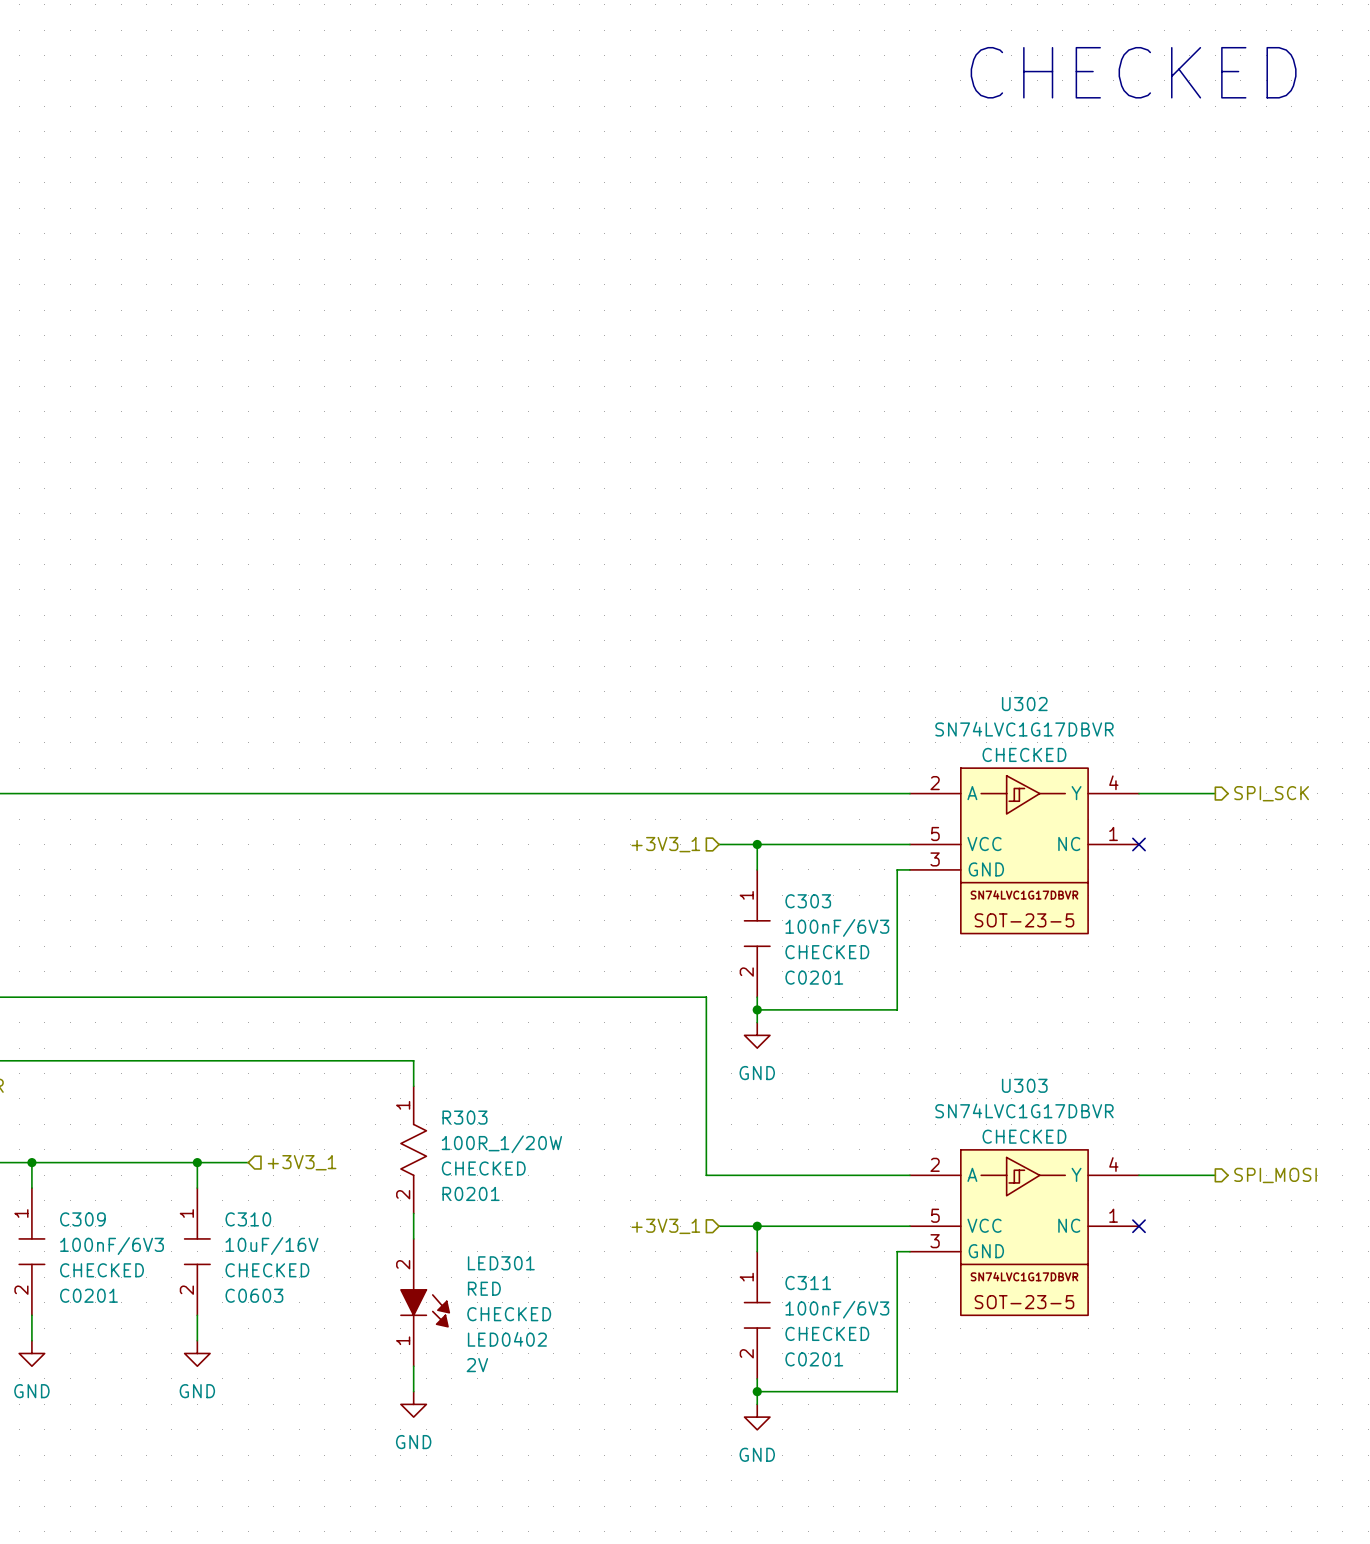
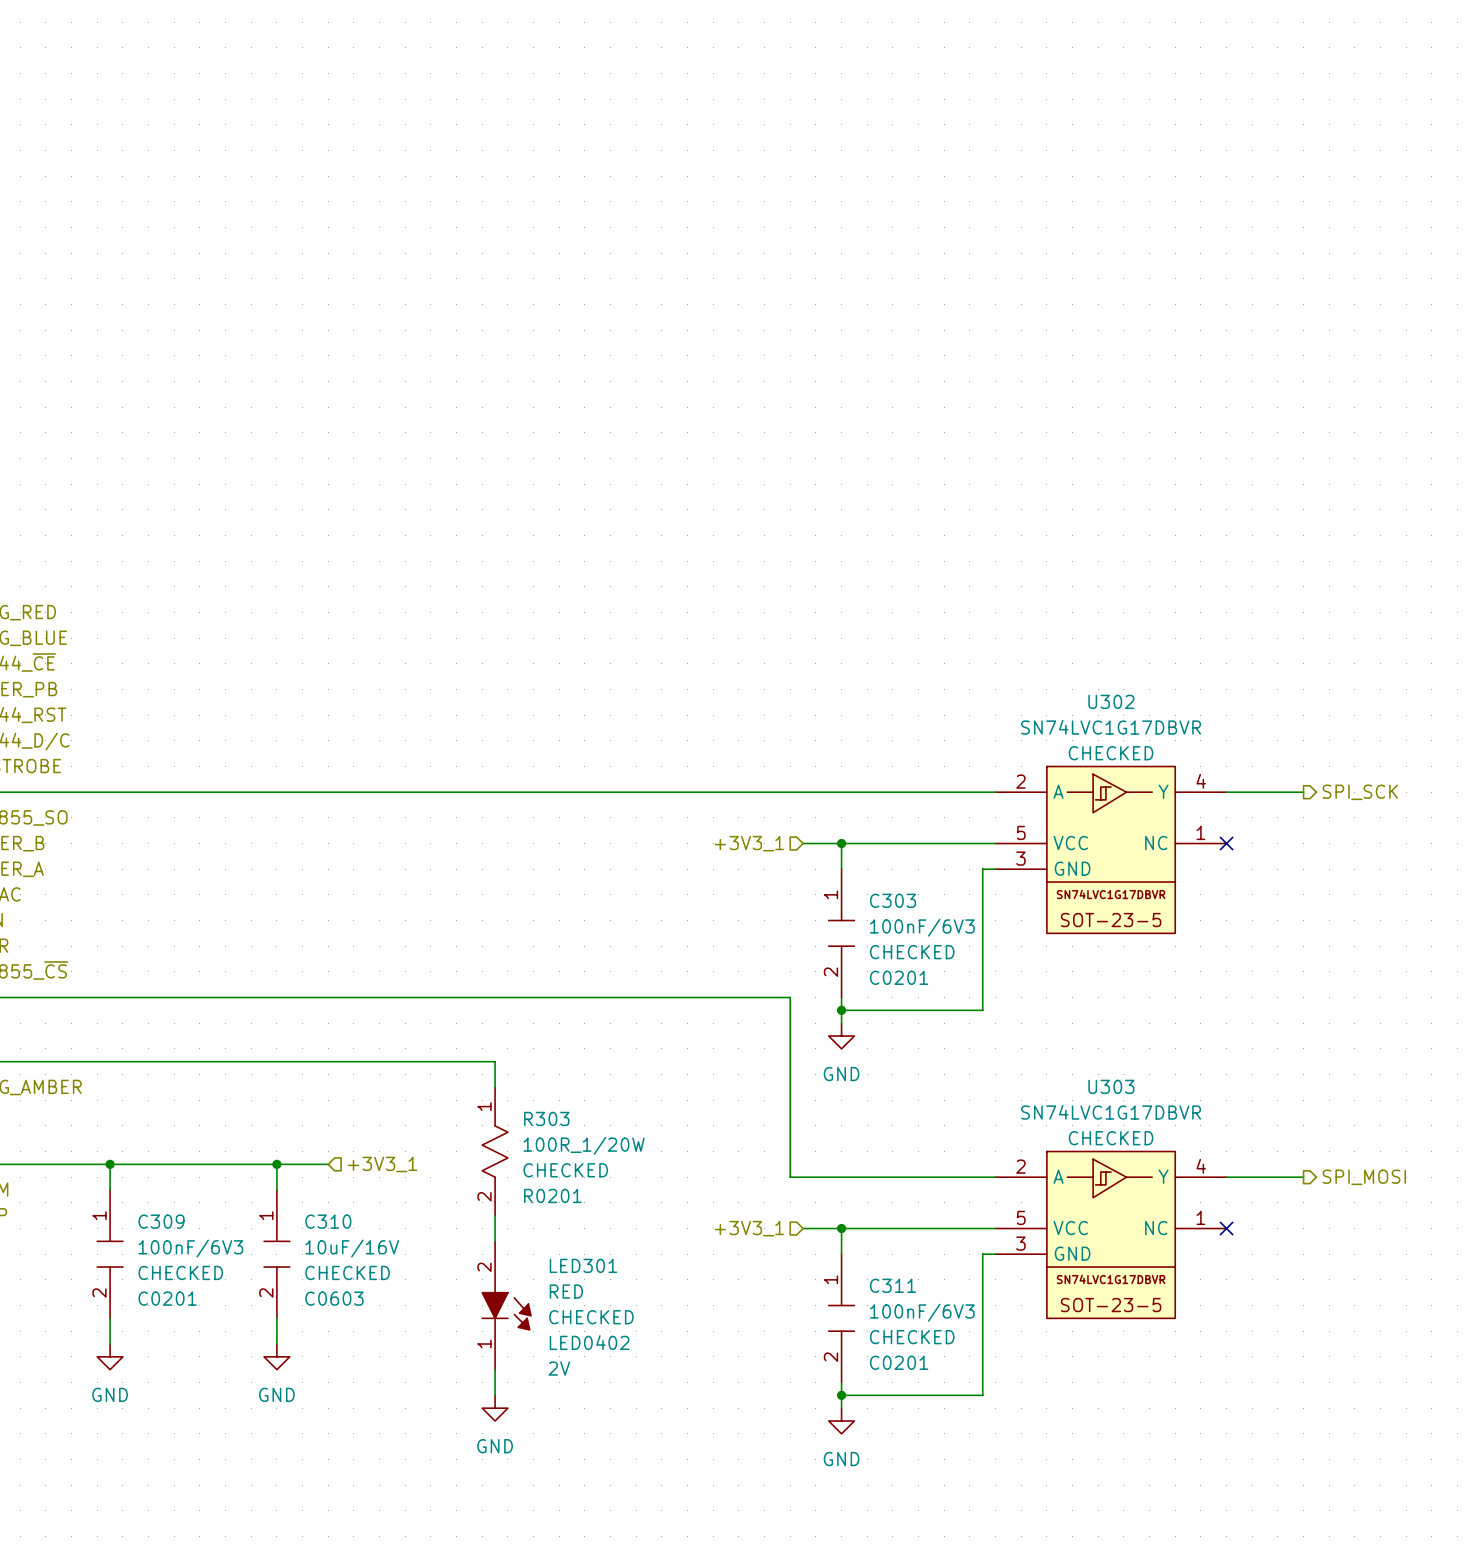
text: CHECKED (1133, 72) -> none

